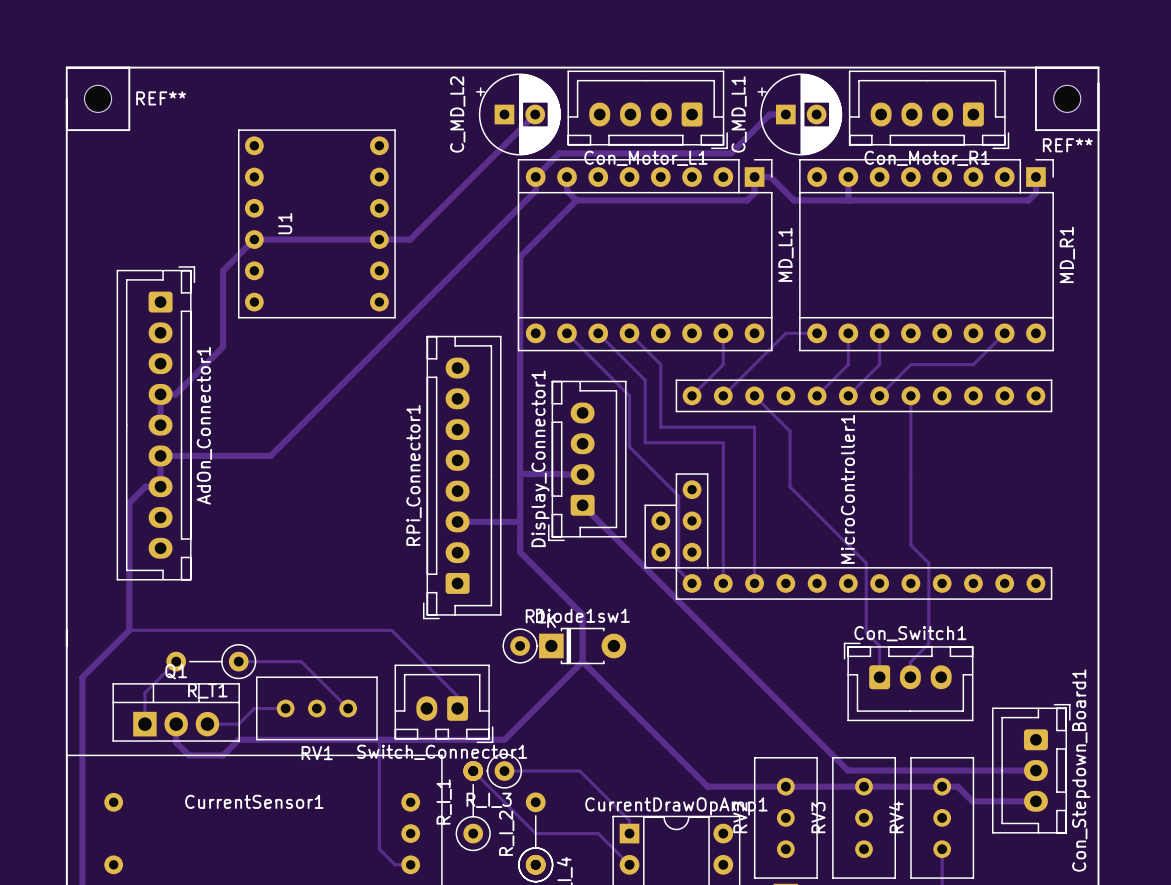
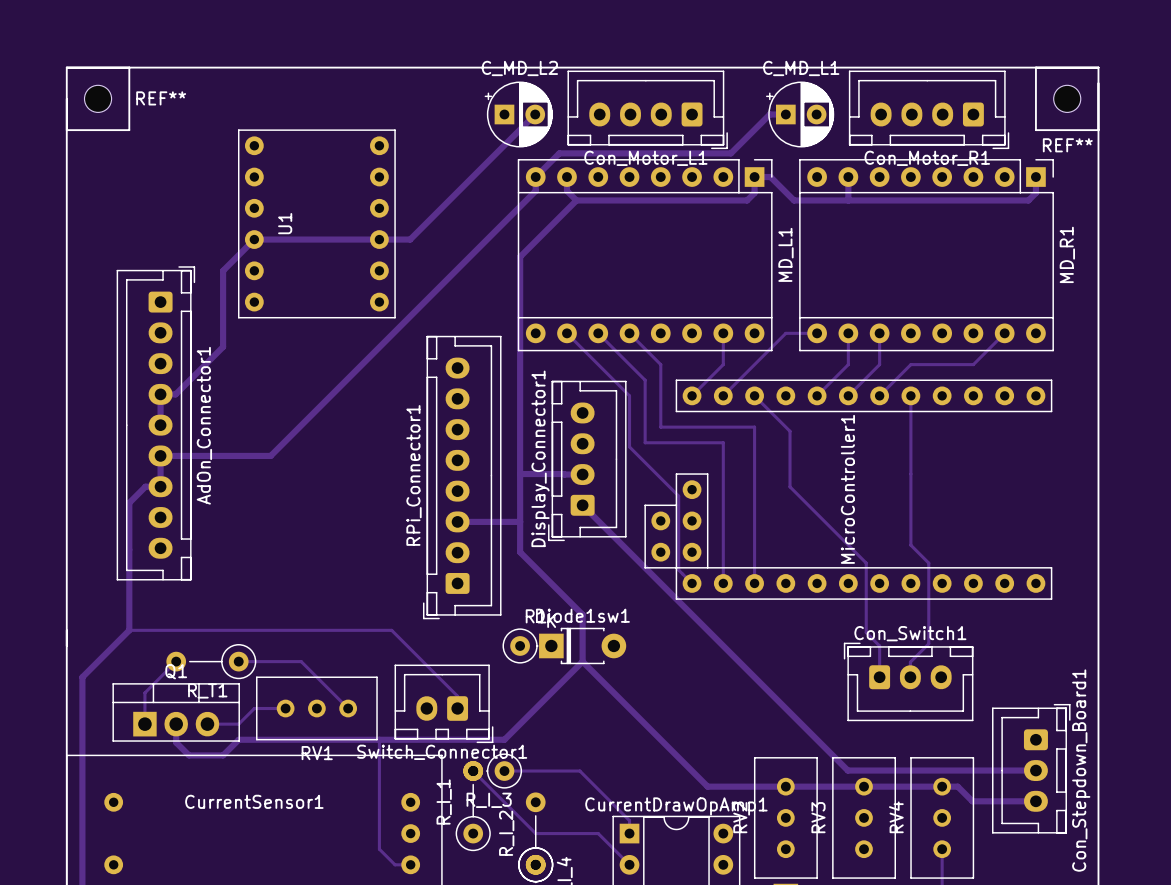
C_MD_L2 footprint: [476, 73, 561, 156] -> [484, 81, 553, 148]
C_MD_L1 footprint: [757, 73, 843, 156] -> [765, 81, 835, 148]
C_MD_L2 name rotation: 0° (457, 114) -> 90° clockwise (519, 68)
C_MD_L1 name rotation: 0° (739, 114) -> 90° clockwise (801, 68)

